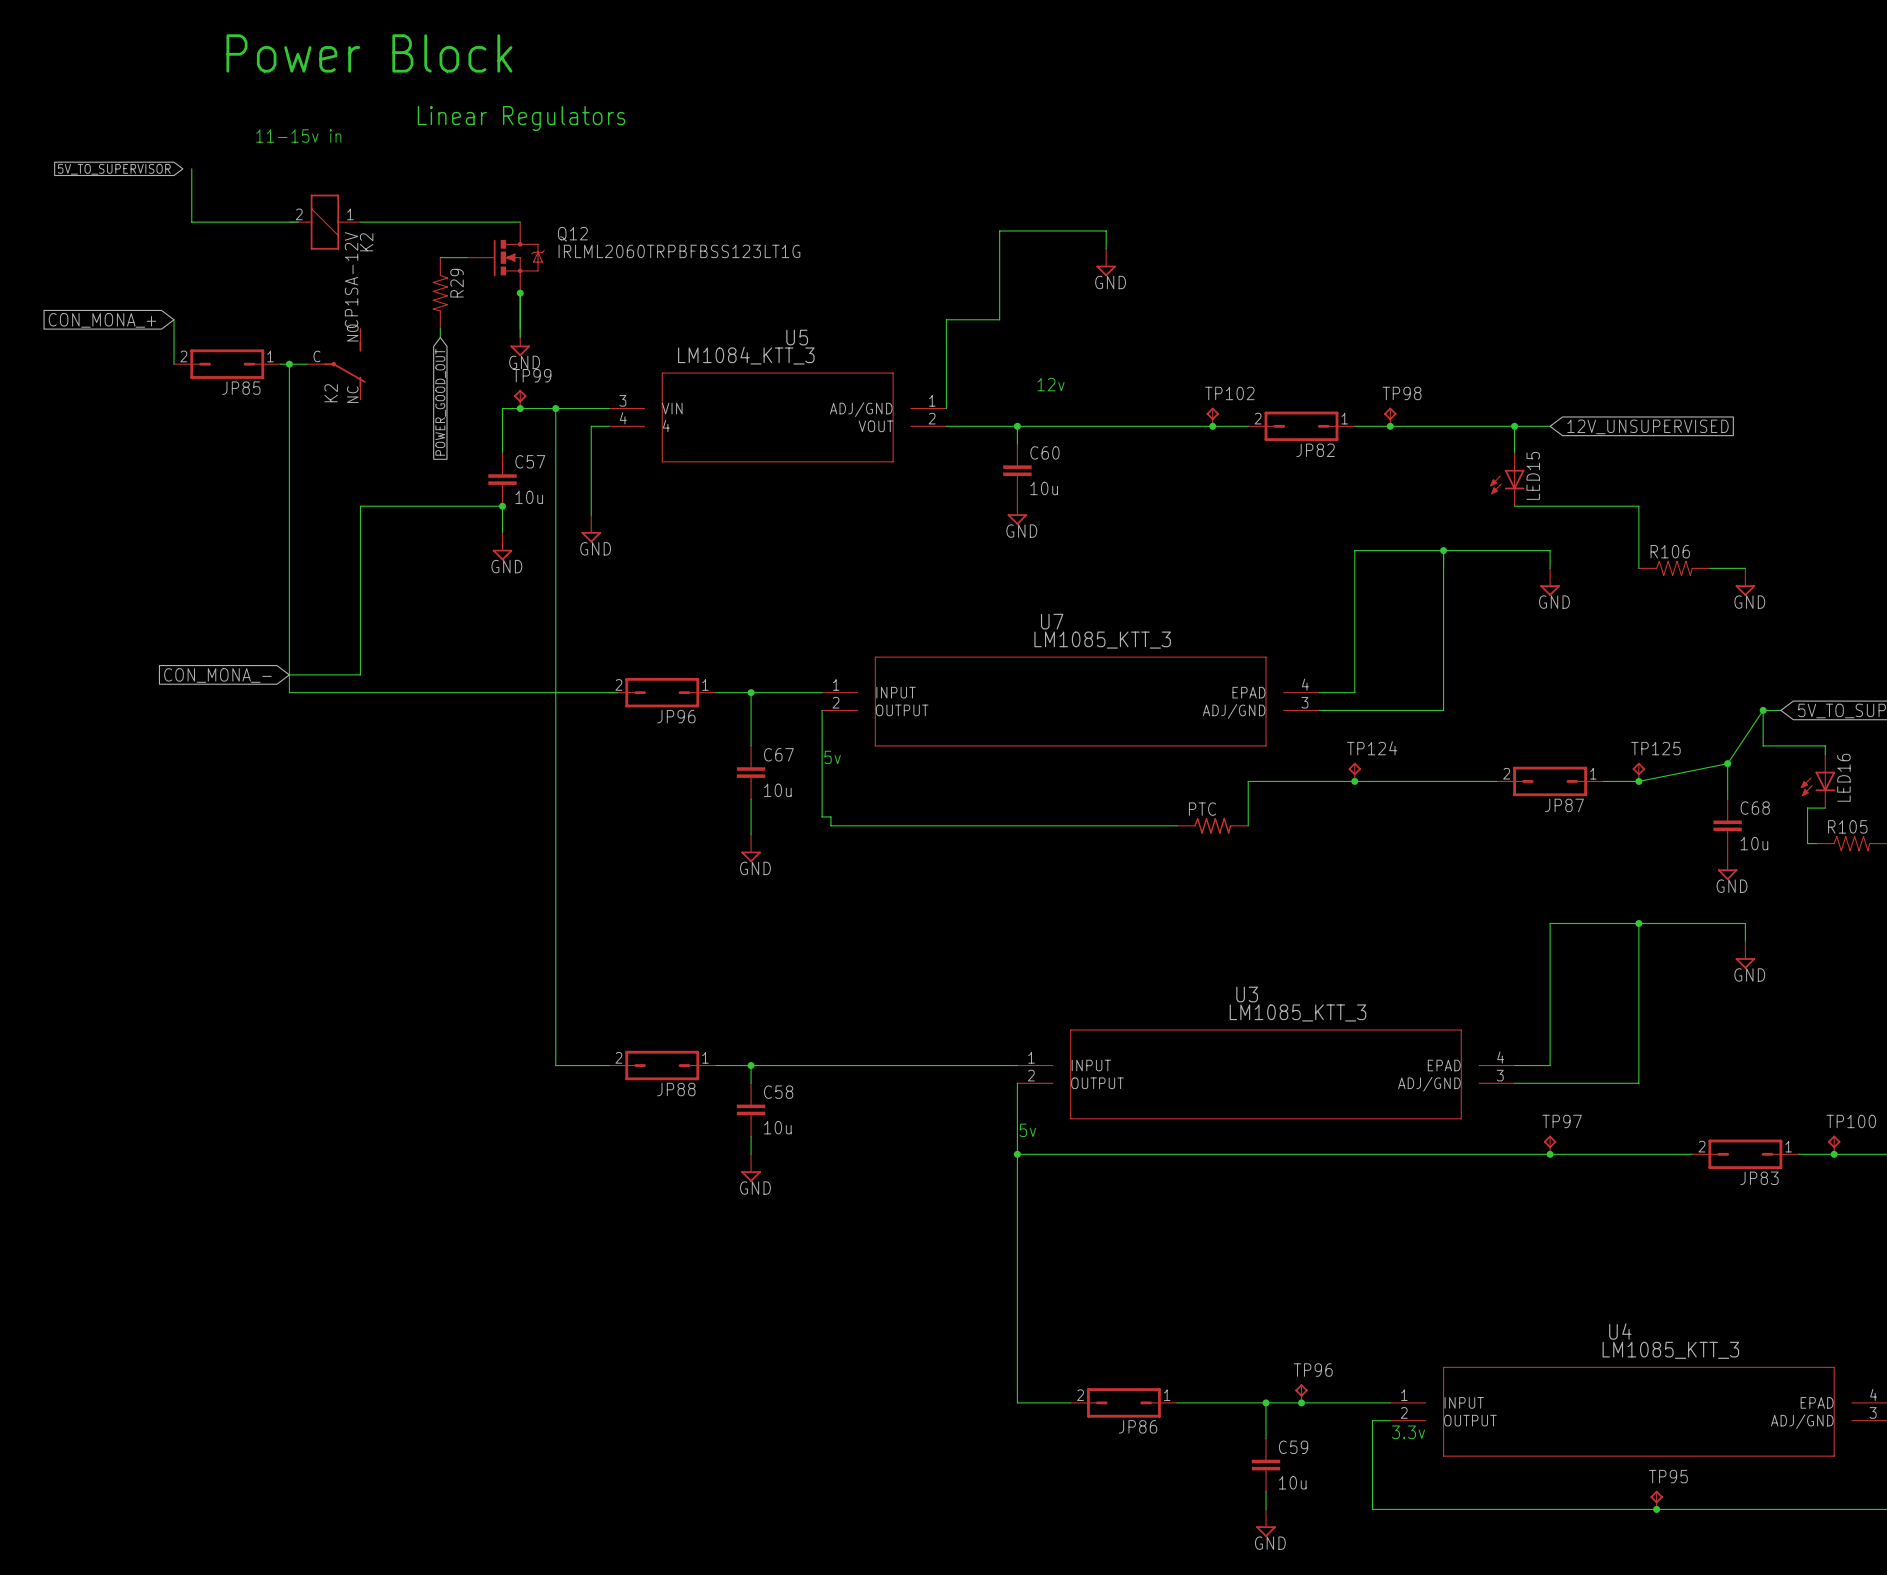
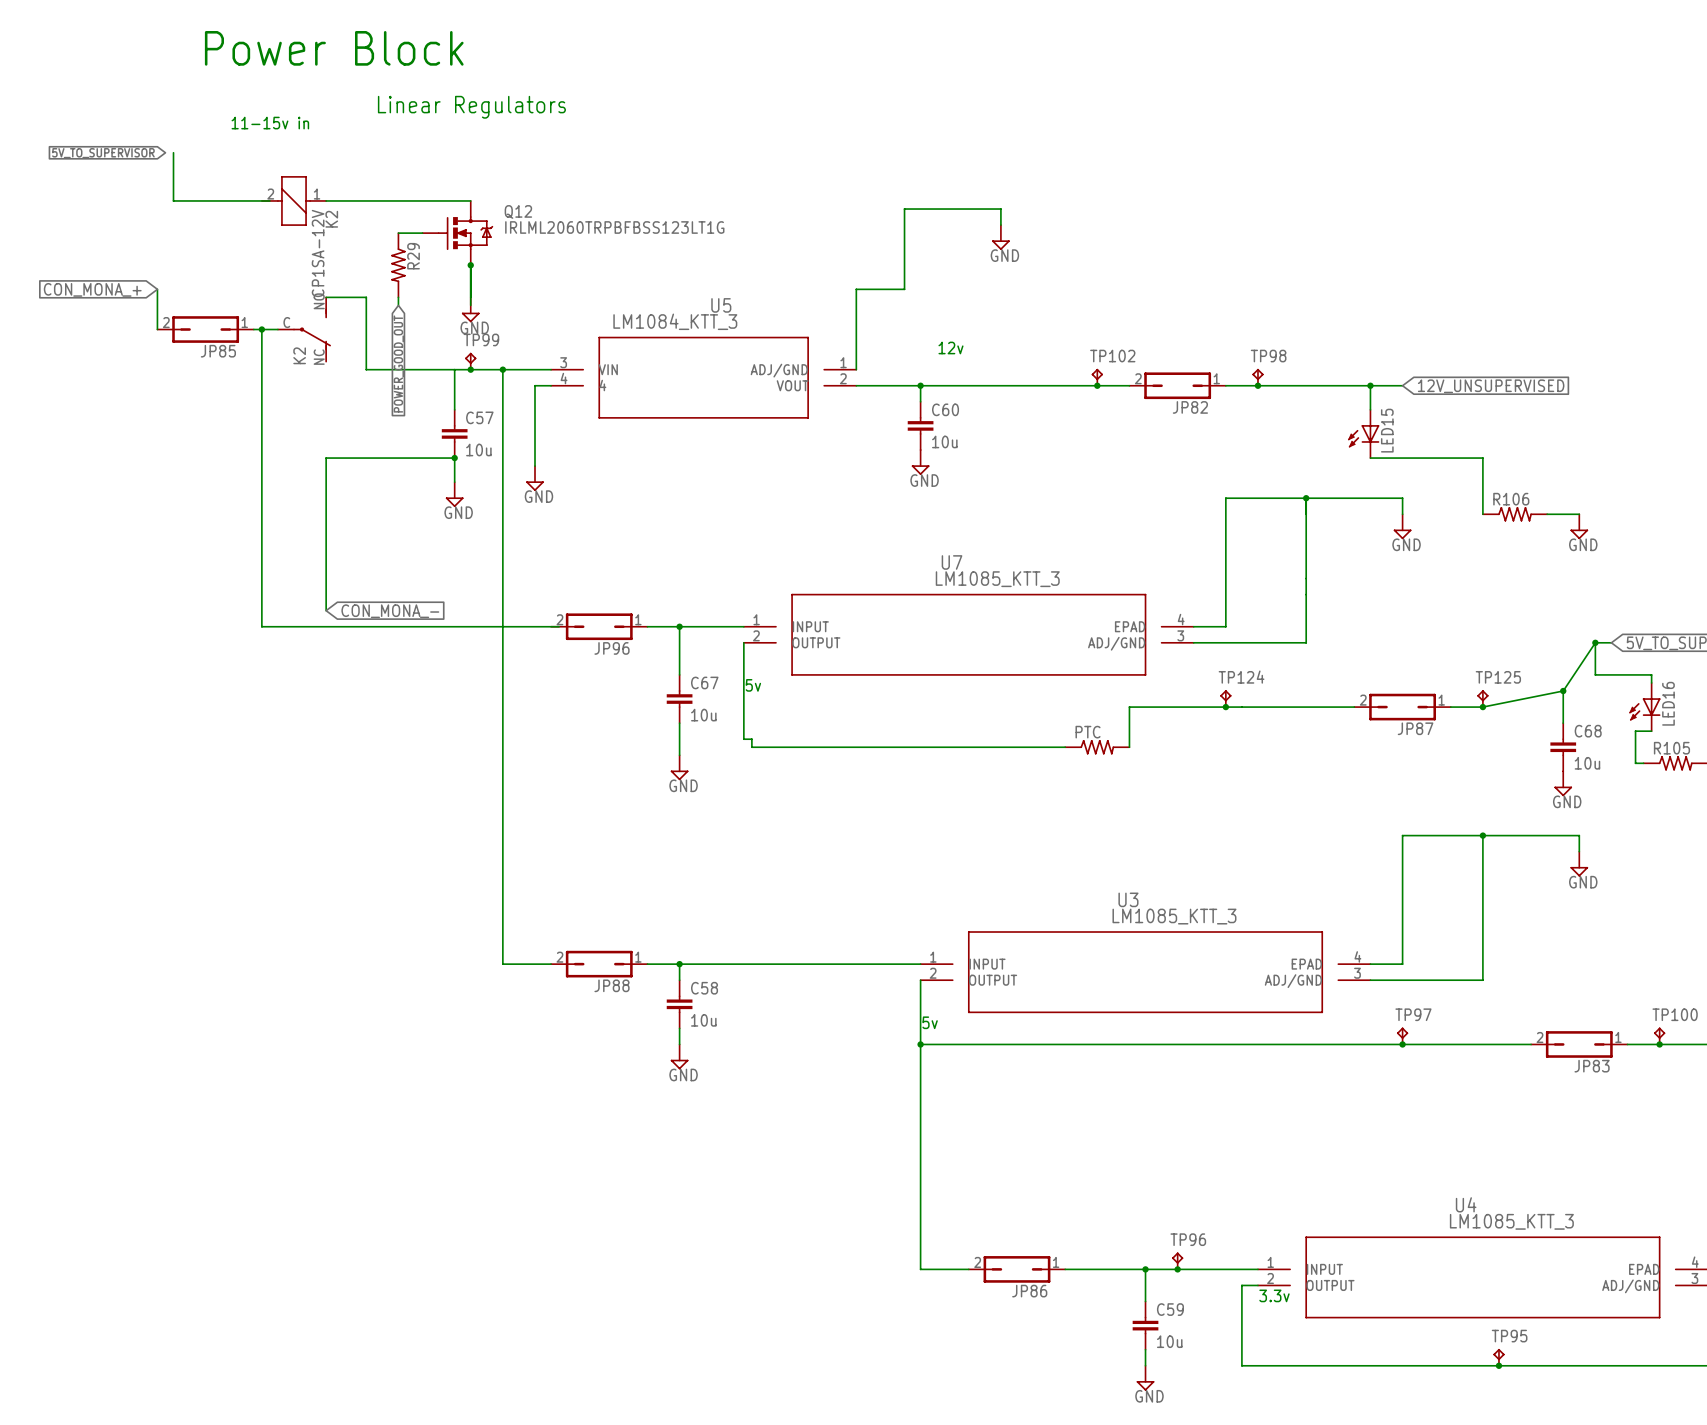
wire: none -> (326, 297) (366, 297) (366, 369) (454, 369)
wire: (289, 674) (360, 674) -> none
global label rotation: 0° (217, 675) -> 180° (390, 611)
global label position: CON_MONA_- (217, 675) -> CON_MONA_- (390, 611)

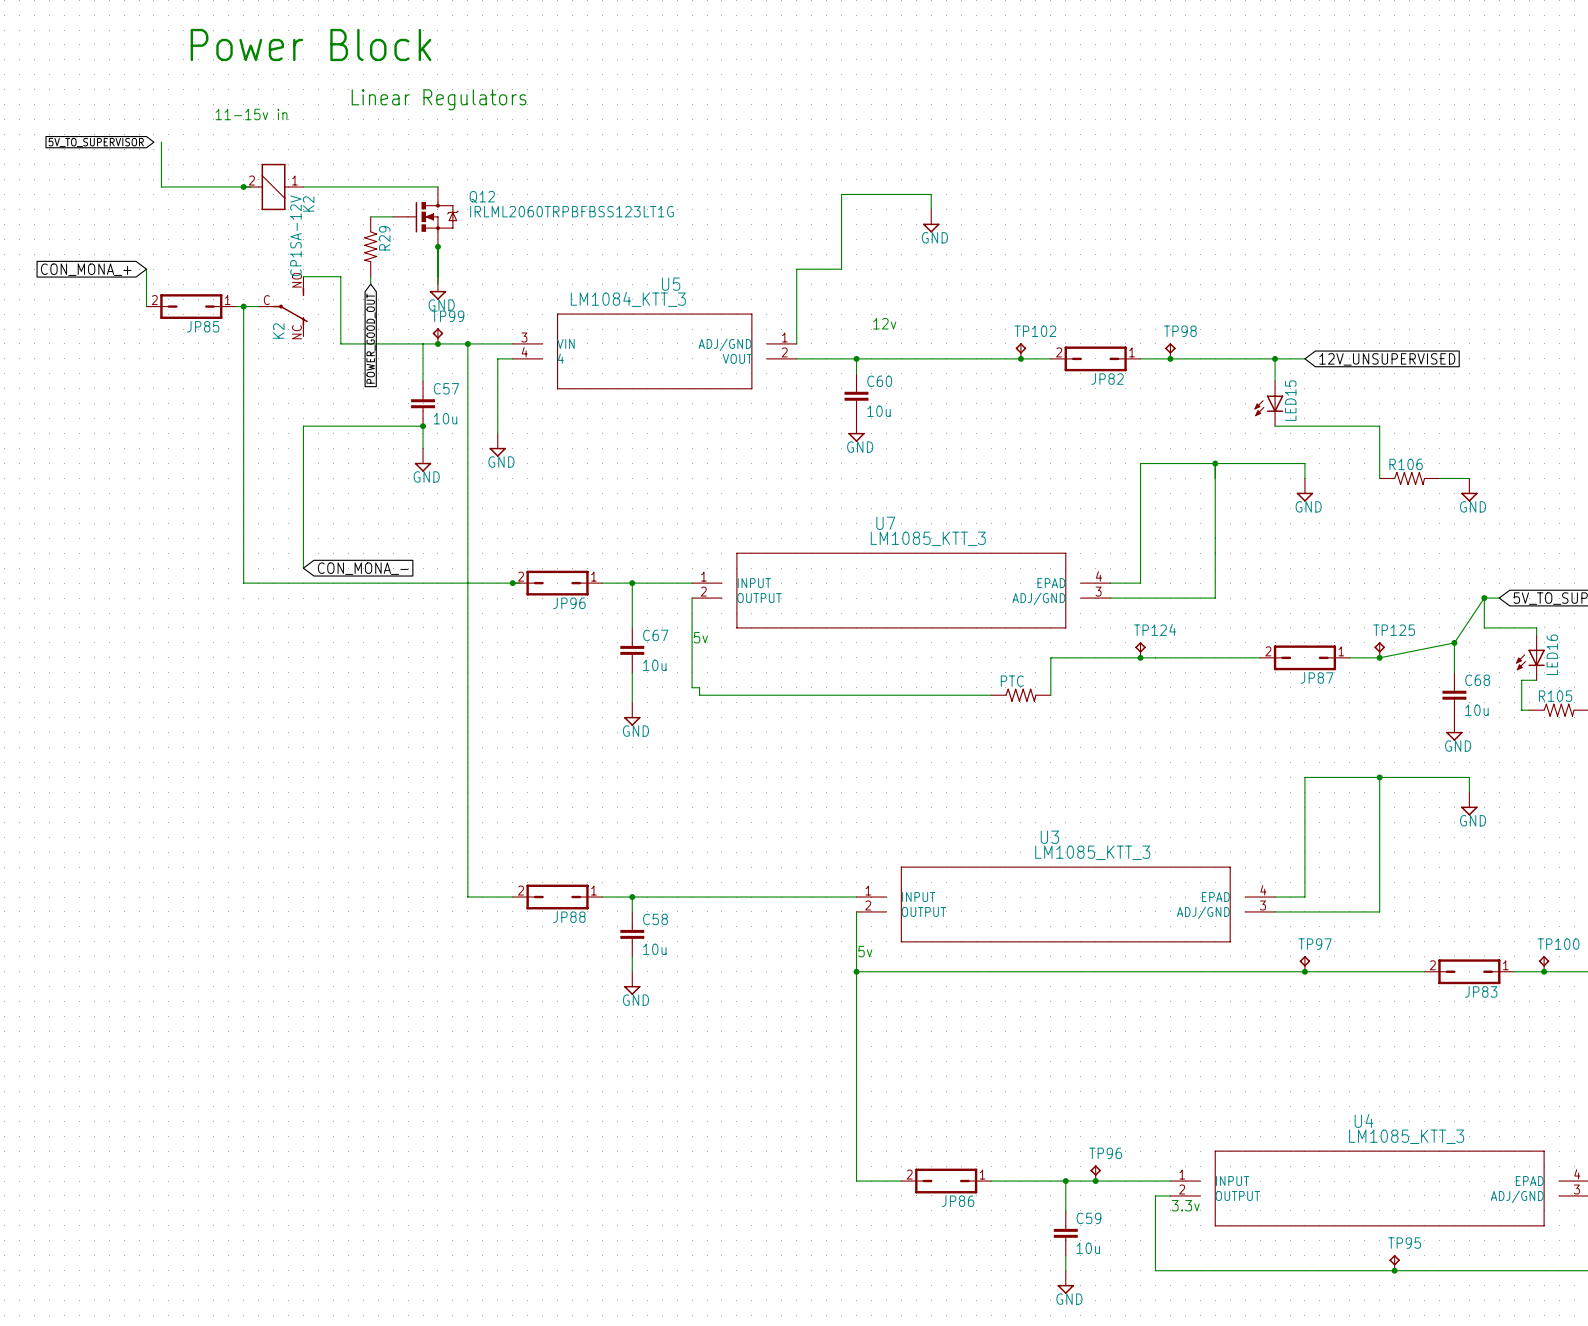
junction: none -> (243, 186)
junction: none -> (512, 583)

